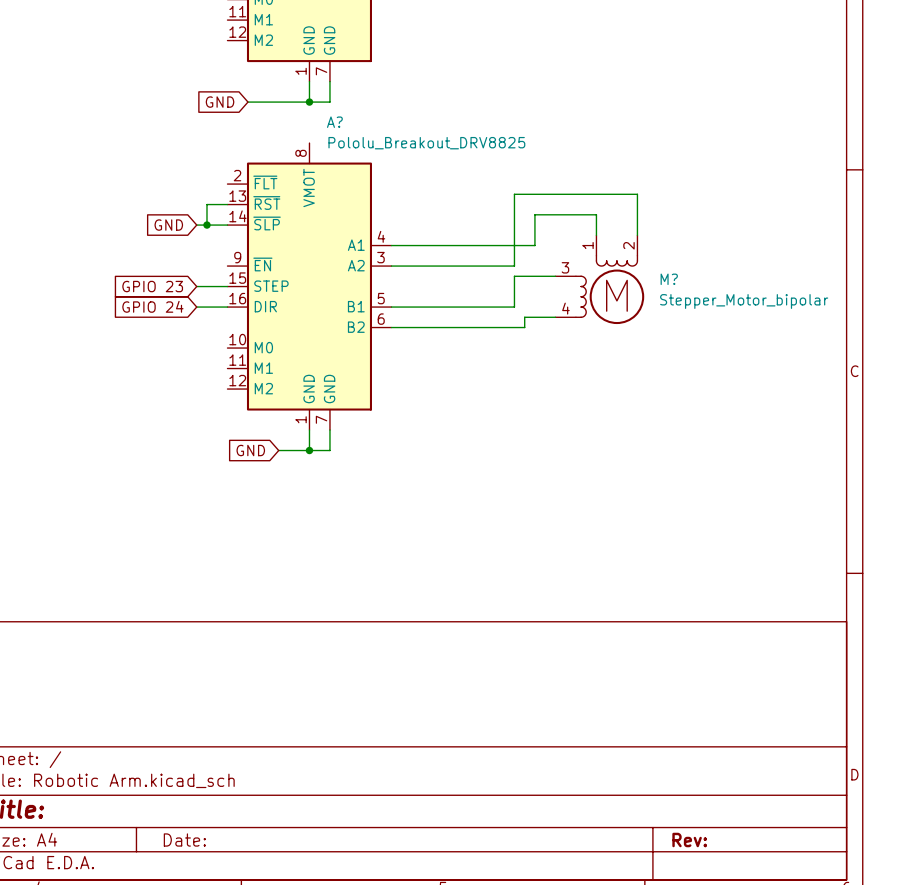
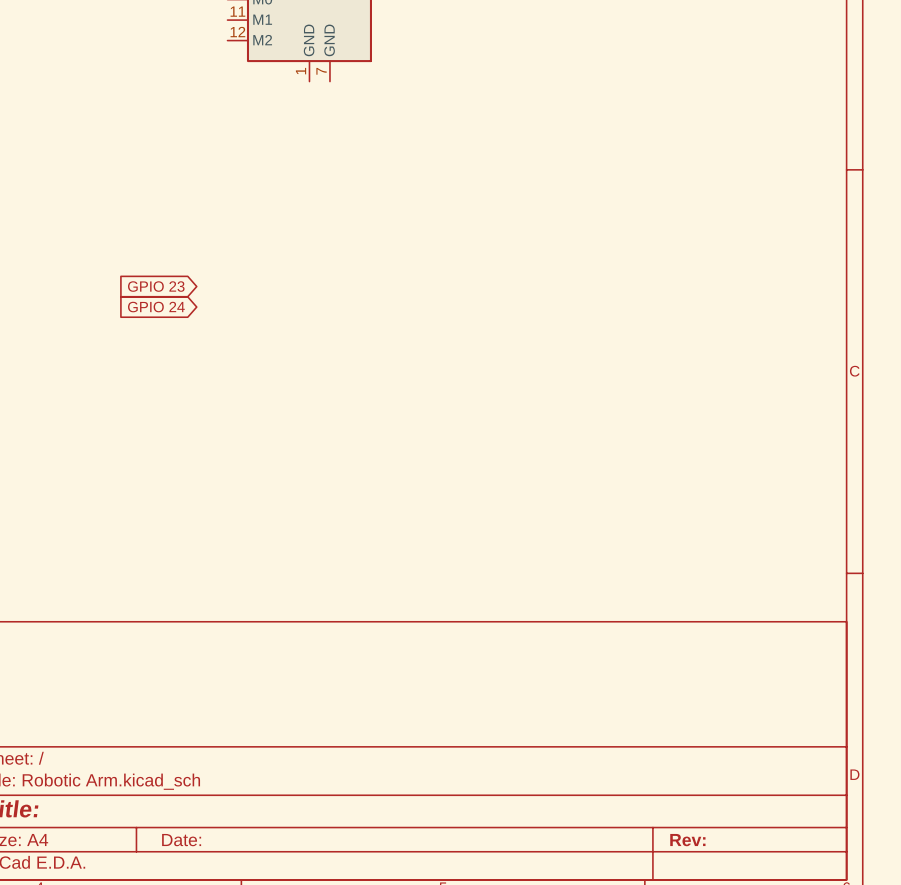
wire: (309, 81) (309, 102) -> none
wire: (329, 81) (329, 102) (247, 102) -> none
global label: GND (220, 102) -> none
junction: (309, 102) -> none
wire: (227, 204) (206, 204) (206, 225) -> none
global label: GND (168, 225) -> none
wire: (196, 225) (227, 225) -> none
junction: (206, 225) -> none
wire: (596, 235) (596, 214) (534, 214) (534, 245) (391, 245) -> none
wire: (637, 235) (637, 194) (514, 194) (514, 266) (391, 266) -> none
wire: (555, 276) (514, 276) (514, 307) (391, 307) -> none
M?: Stepper_Motor_bipolar (599, 279) -> none
wire: (196, 286) (227, 286) -> none
A?: Pololu_Breakout_DRV8825 (309, 286) -> none
wire: (196, 307) (227, 307) -> none
wire: (555, 317) (524, 317) (524, 327) (391, 327) -> none
wire: (309, 430) (309, 450) -> none
wire: (329, 430) (329, 450) (278, 450) -> none
global label: GND (250, 450) -> none
junction: (309, 450) -> none

